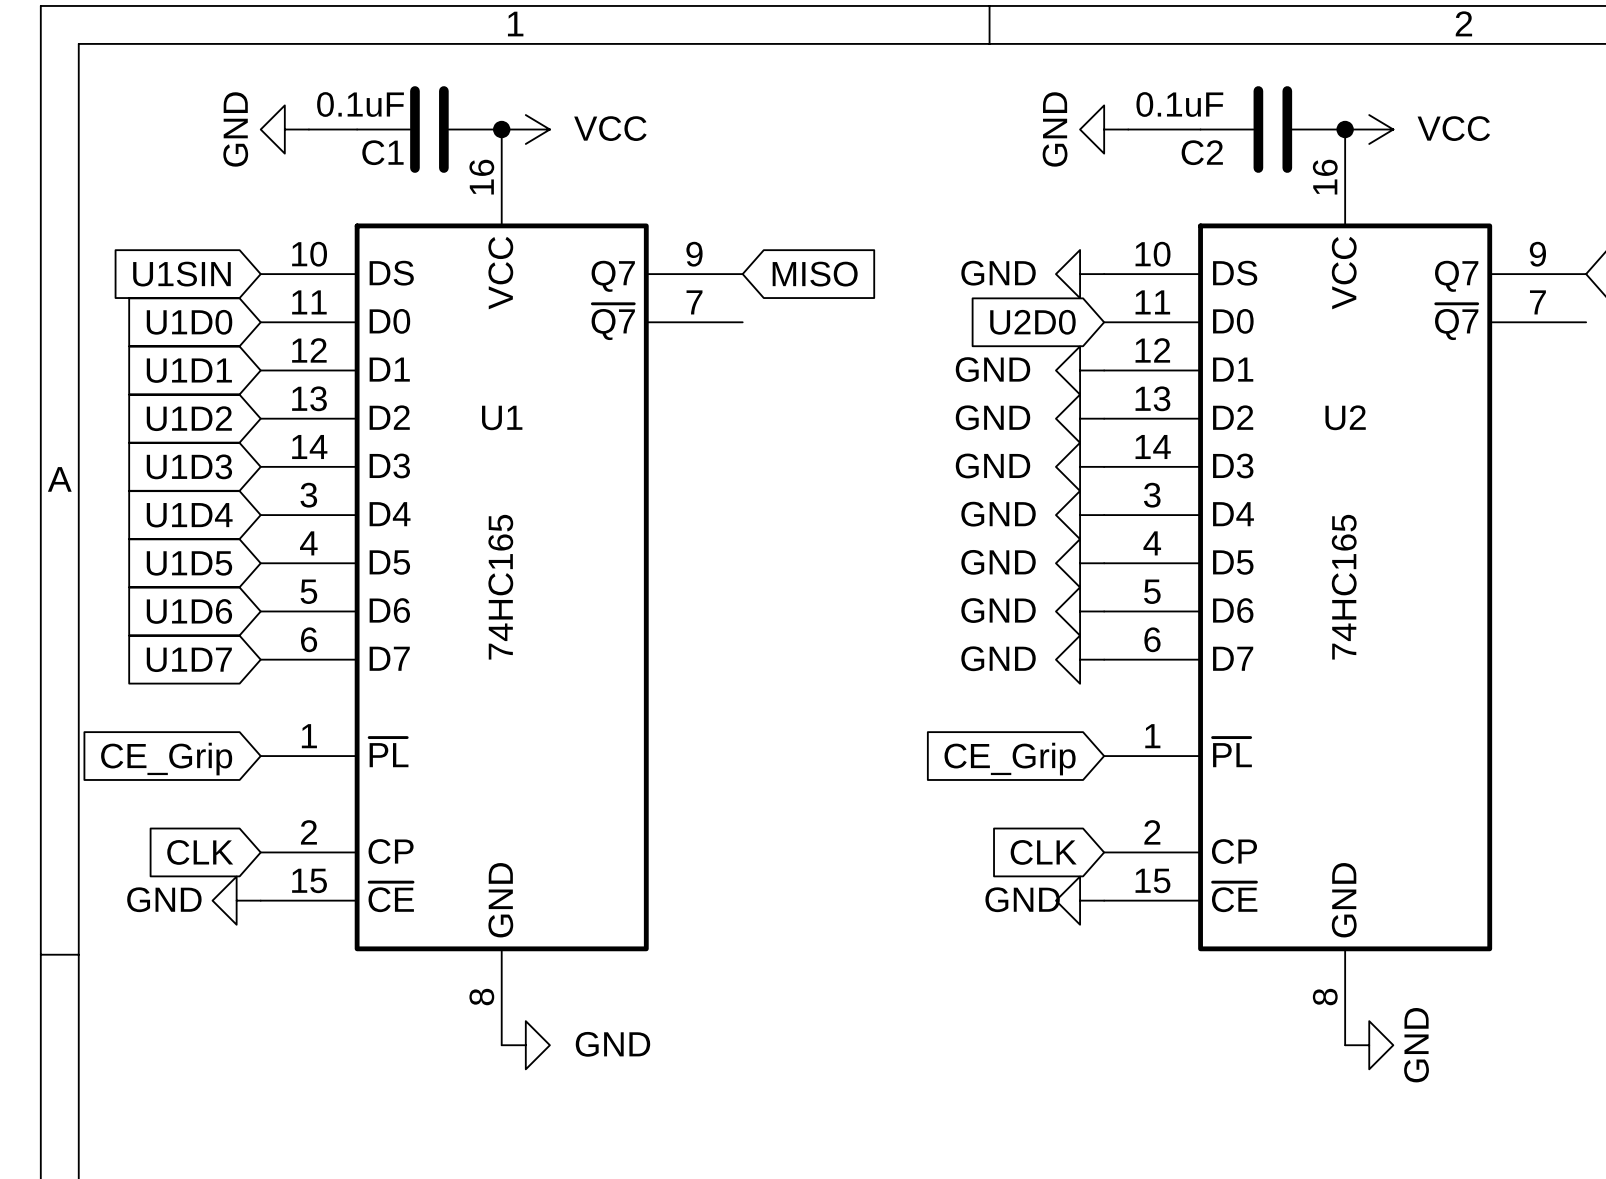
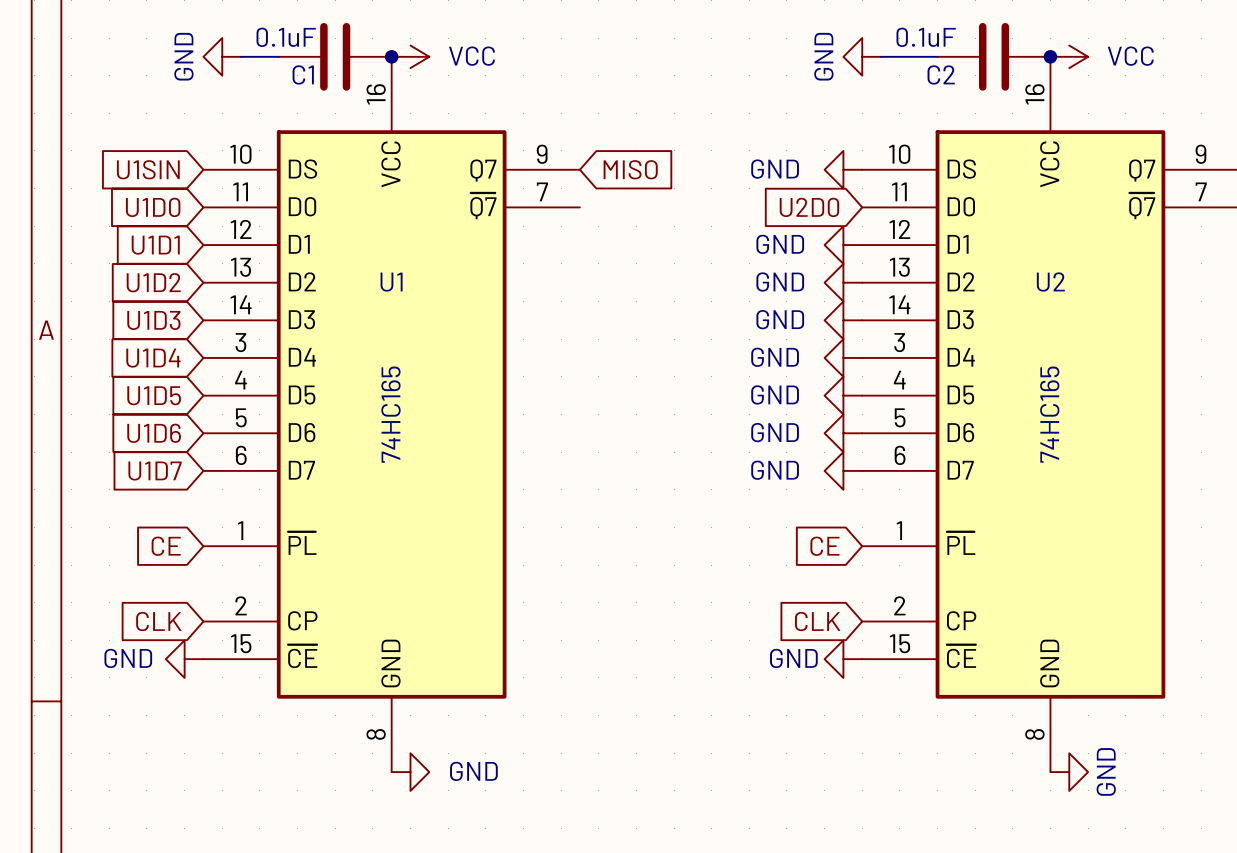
global label: CE_Grip (166, 759) -> CE (166, 546)
global label: CE_Grip (1010, 759) -> CE (824, 546)

